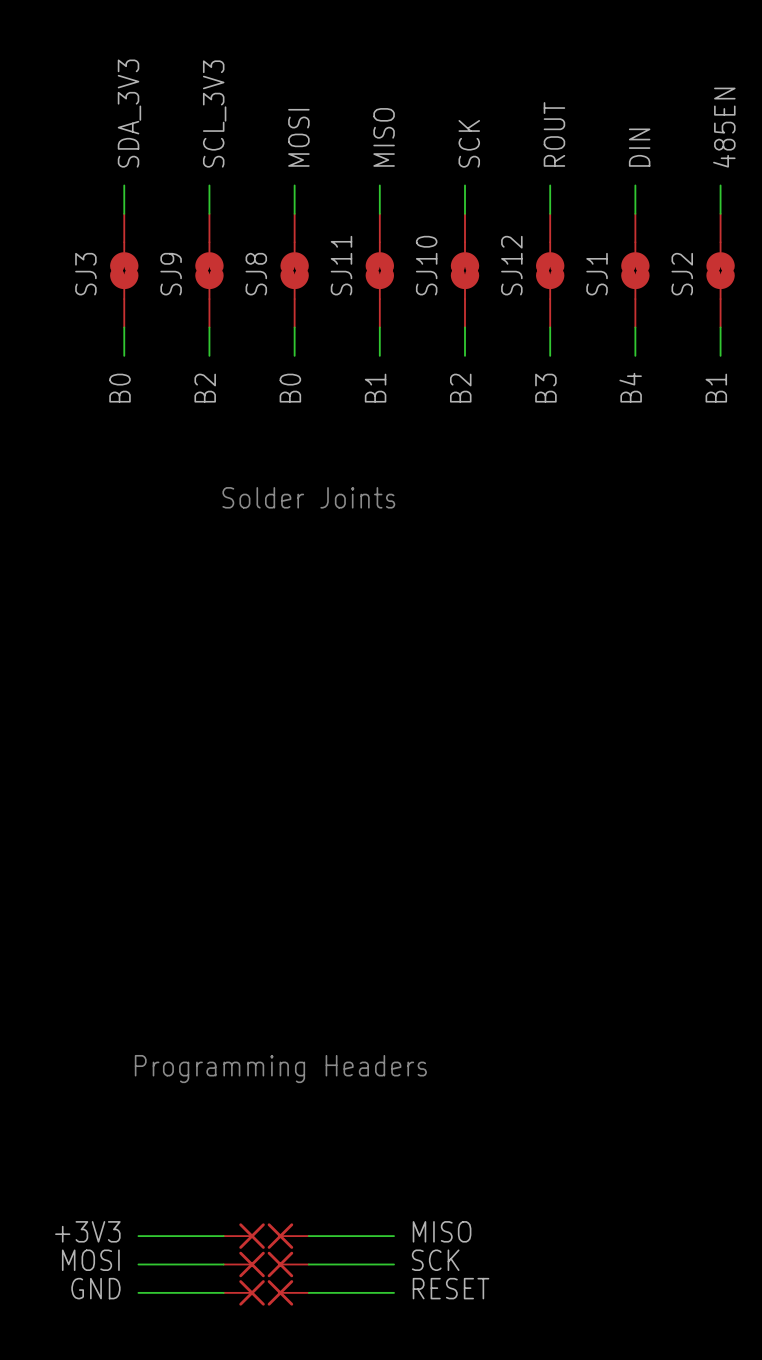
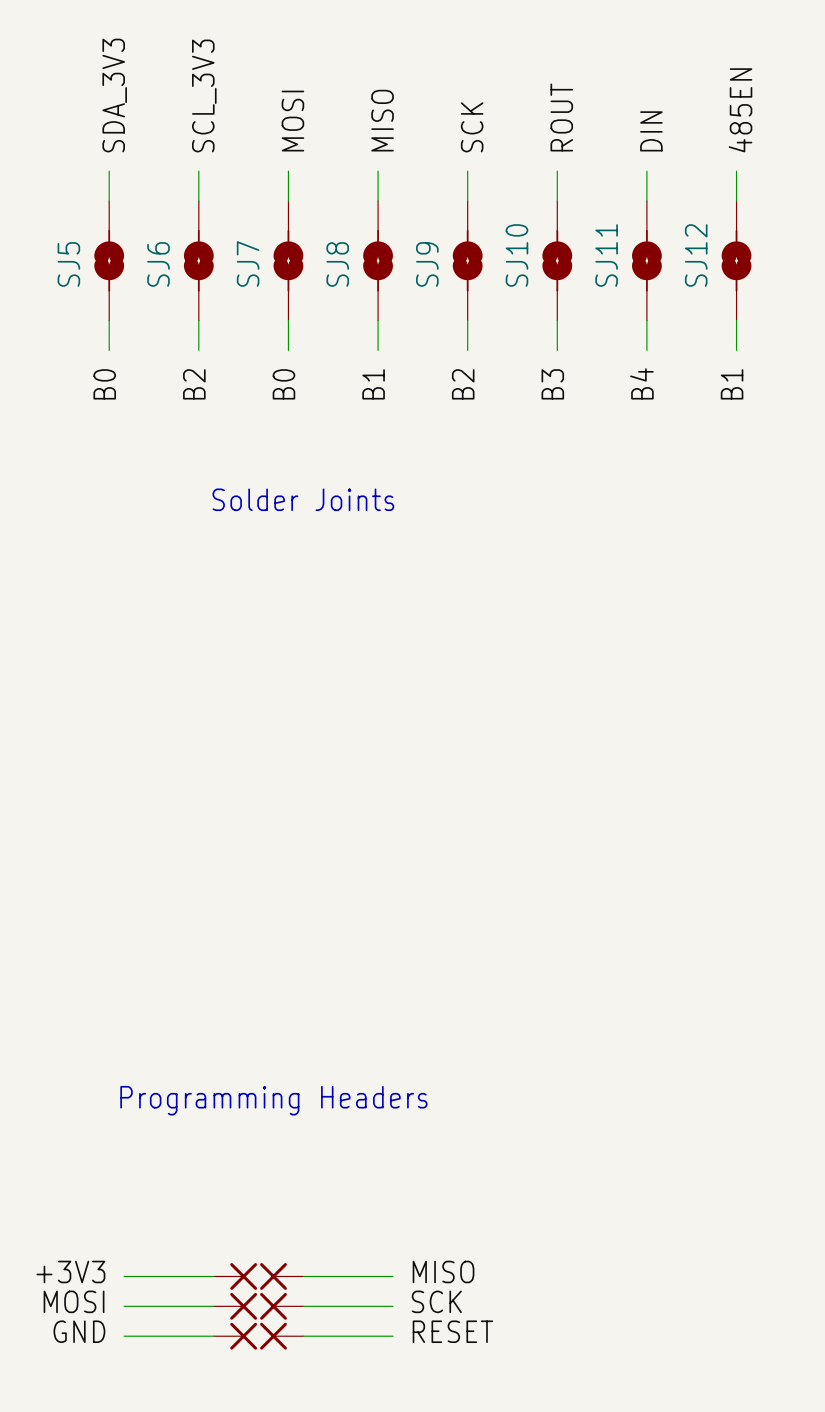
SJ11 name: SJ11 (341, 265) -> SJ8 (337, 264)
SJ10 name: SJ10 (426, 265) -> SJ9 (427, 264)
SJ12 name: SJ12 (511, 265) -> SJ10 (516, 255)
SJ3 name: SJ3 (85, 274) -> SJ5 (68, 264)
SJ9 name: SJ9 (171, 274) -> SJ6 (158, 264)
SJ8 name: SJ8 (256, 274) -> SJ7 (248, 264)
SJ1 name: SJ1 (597, 274) -> SJ11 (606, 255)
SJ2 name: SJ2 (682, 274) -> SJ12 (696, 255)

